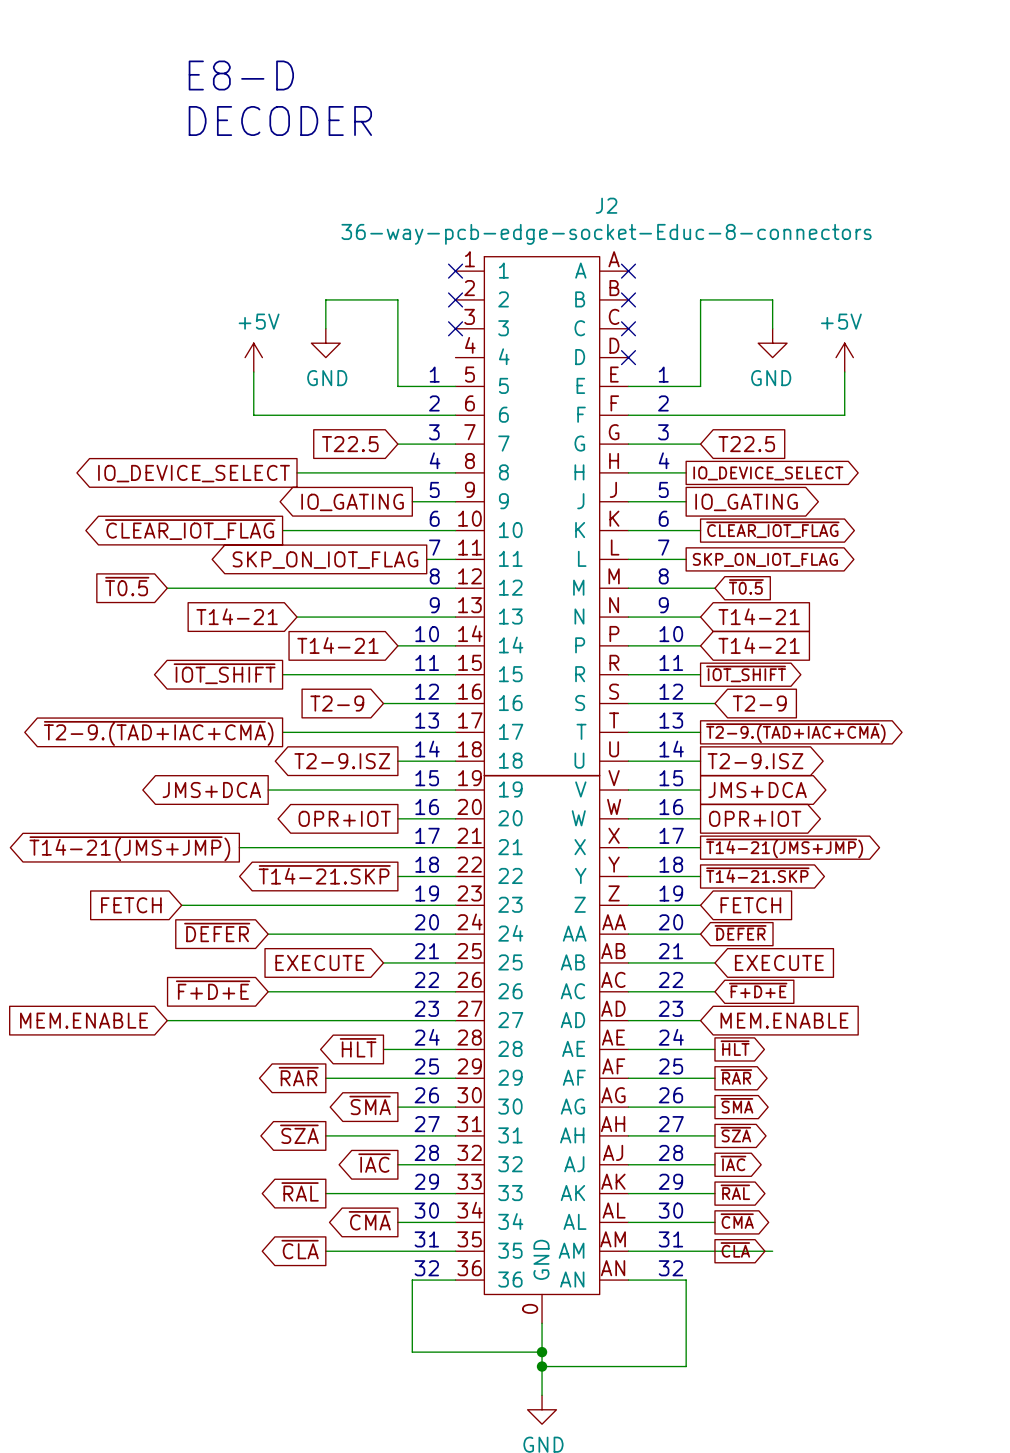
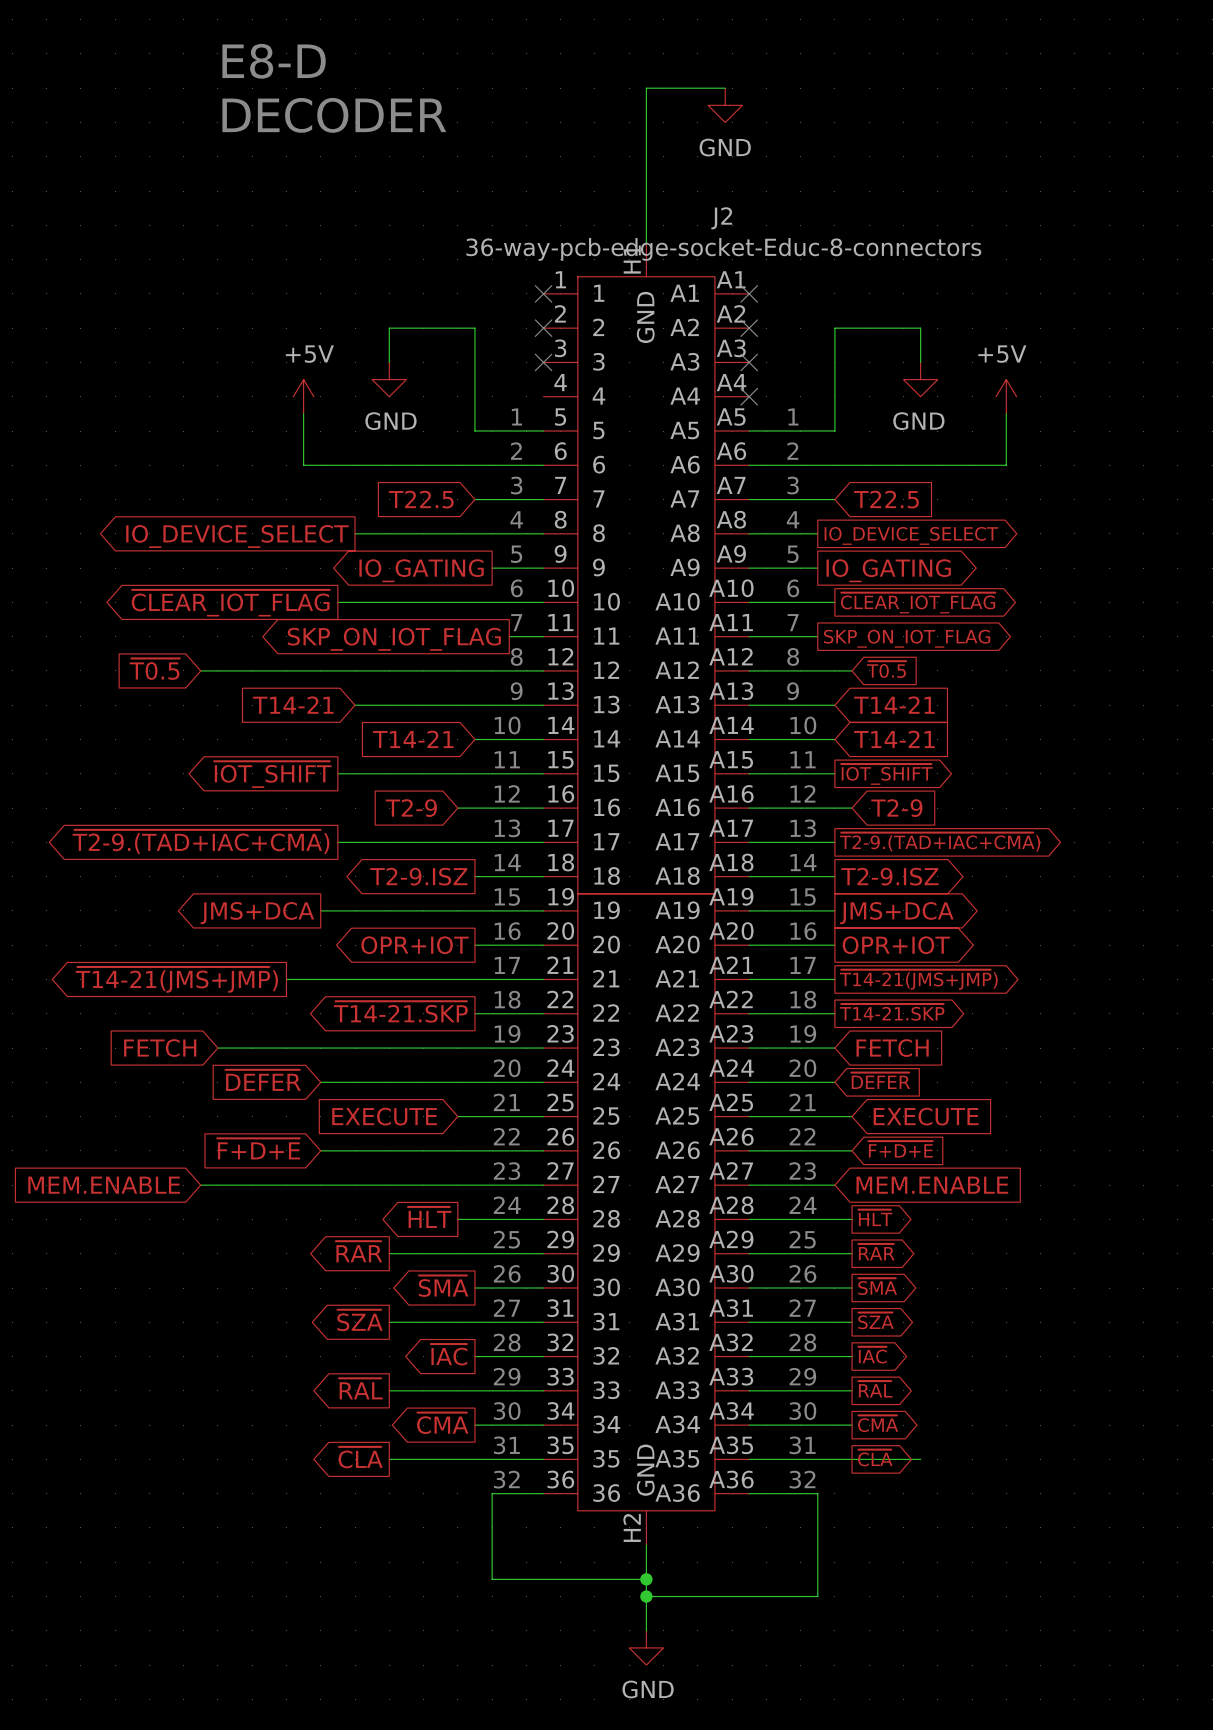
wire: none -> (725, 88) (646, 88) (646, 242)
power symbol: none -> GND (725, 105)
J2 symbol: [455, 256, 629, 1324] -> [543, 242, 750, 1546]

